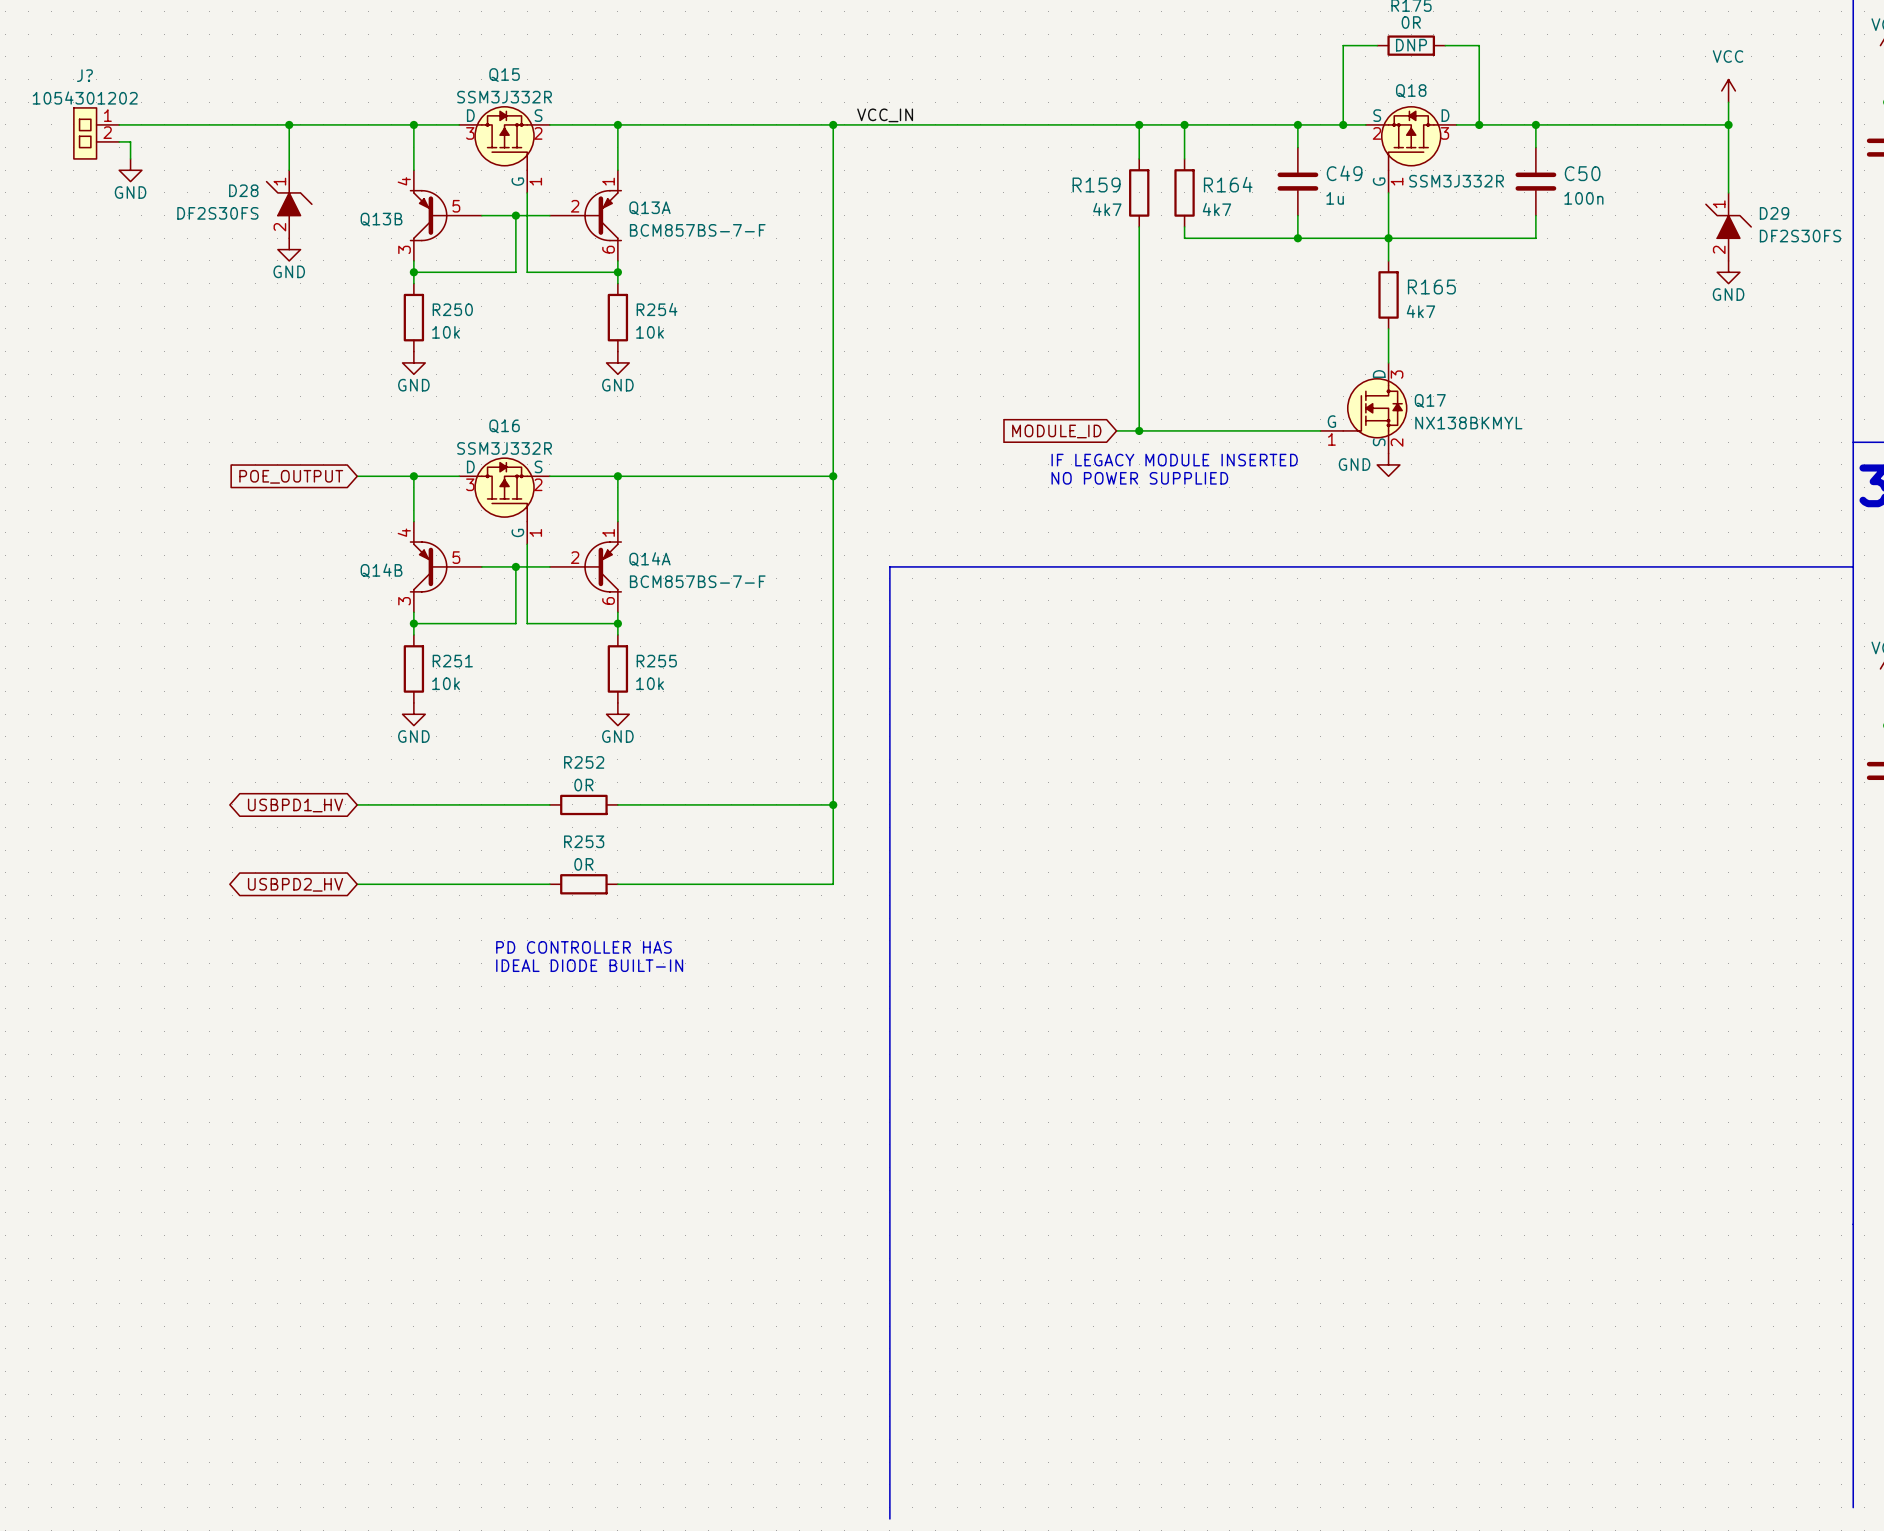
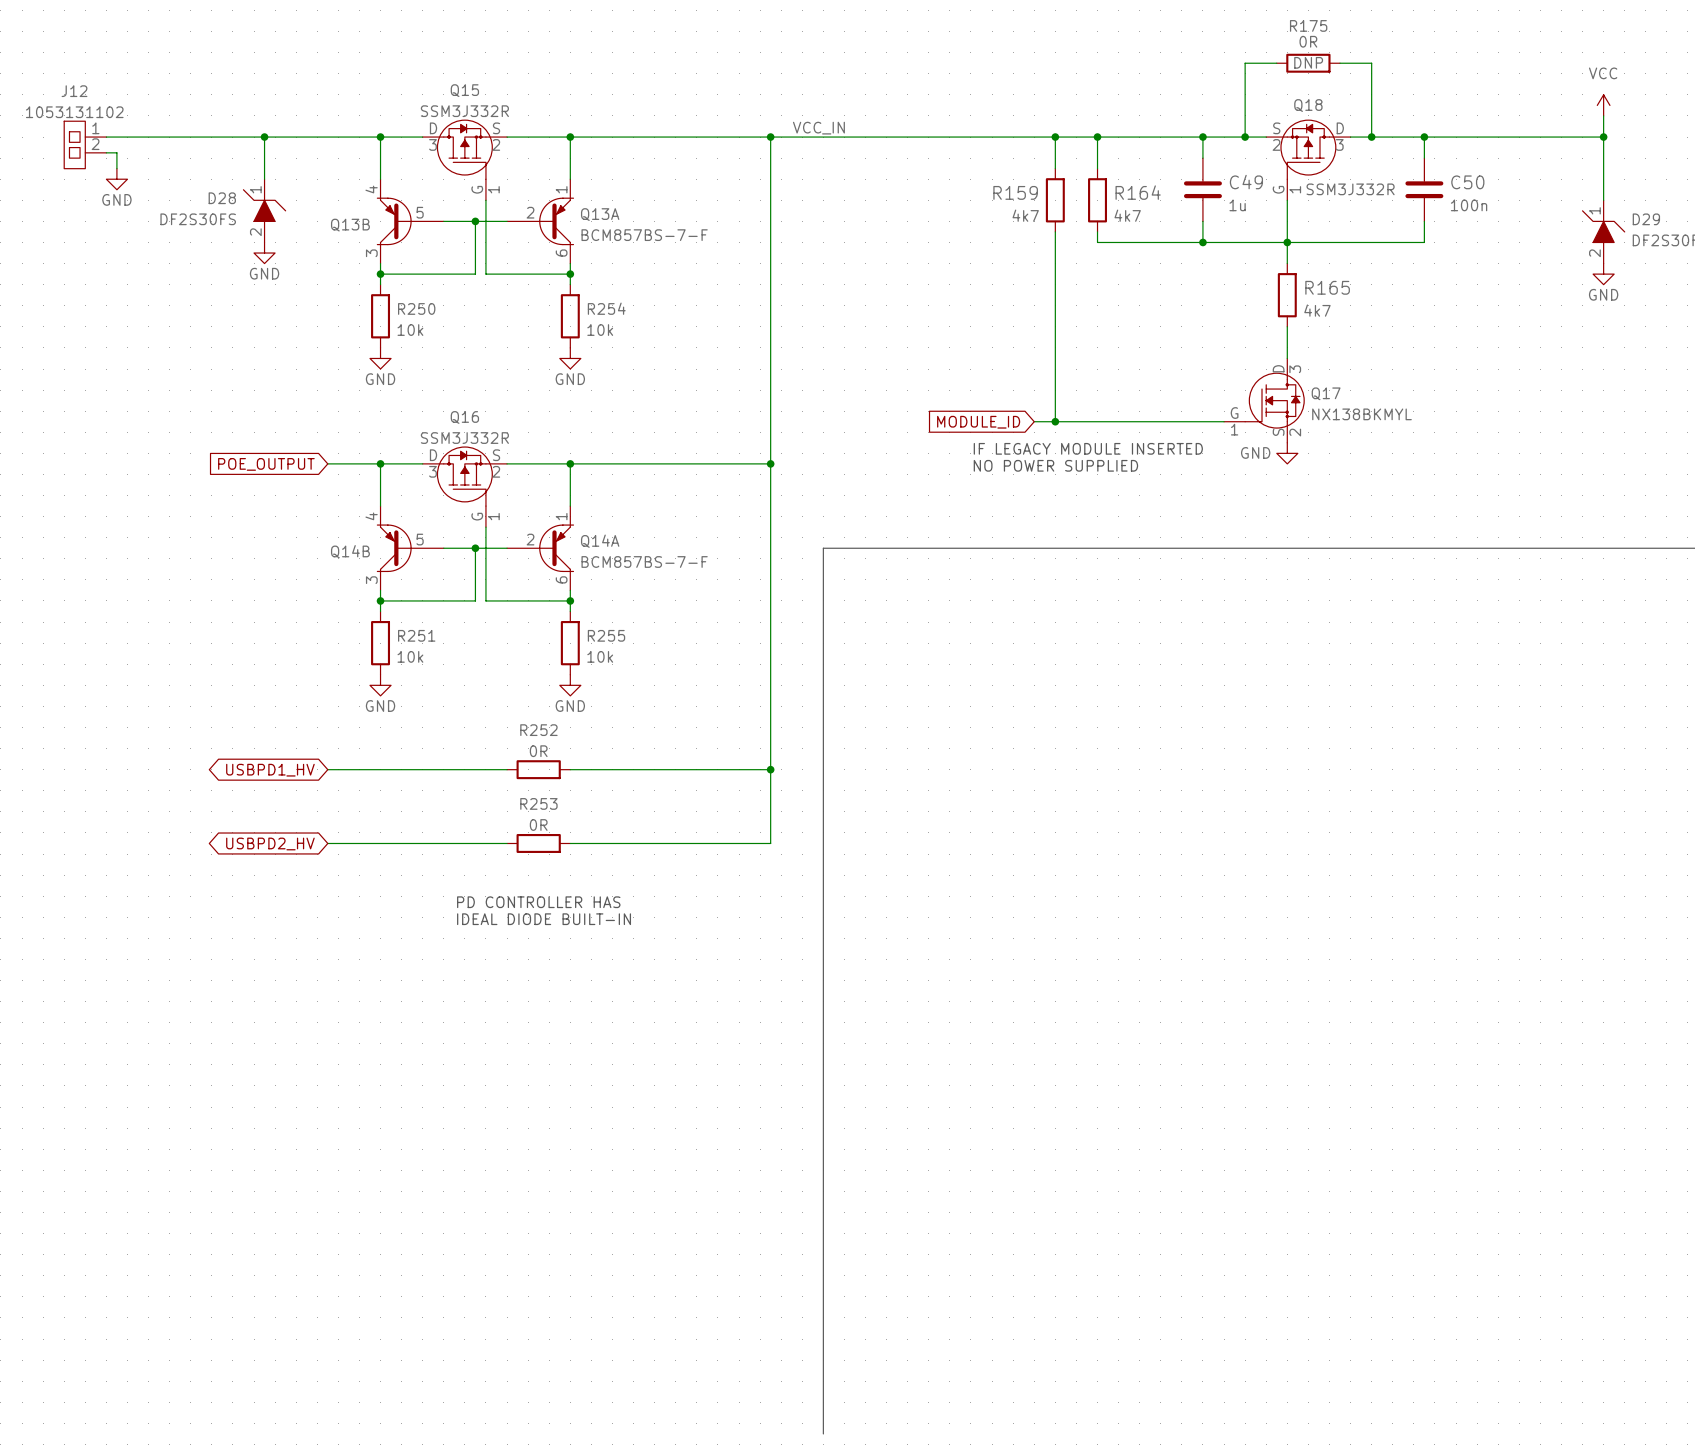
J? name: J? (84, 75) -> J12 (74, 91)
J? text: 1054301202 (85, 98) -> none
J? value: none -> 1053131102 (74, 112)

